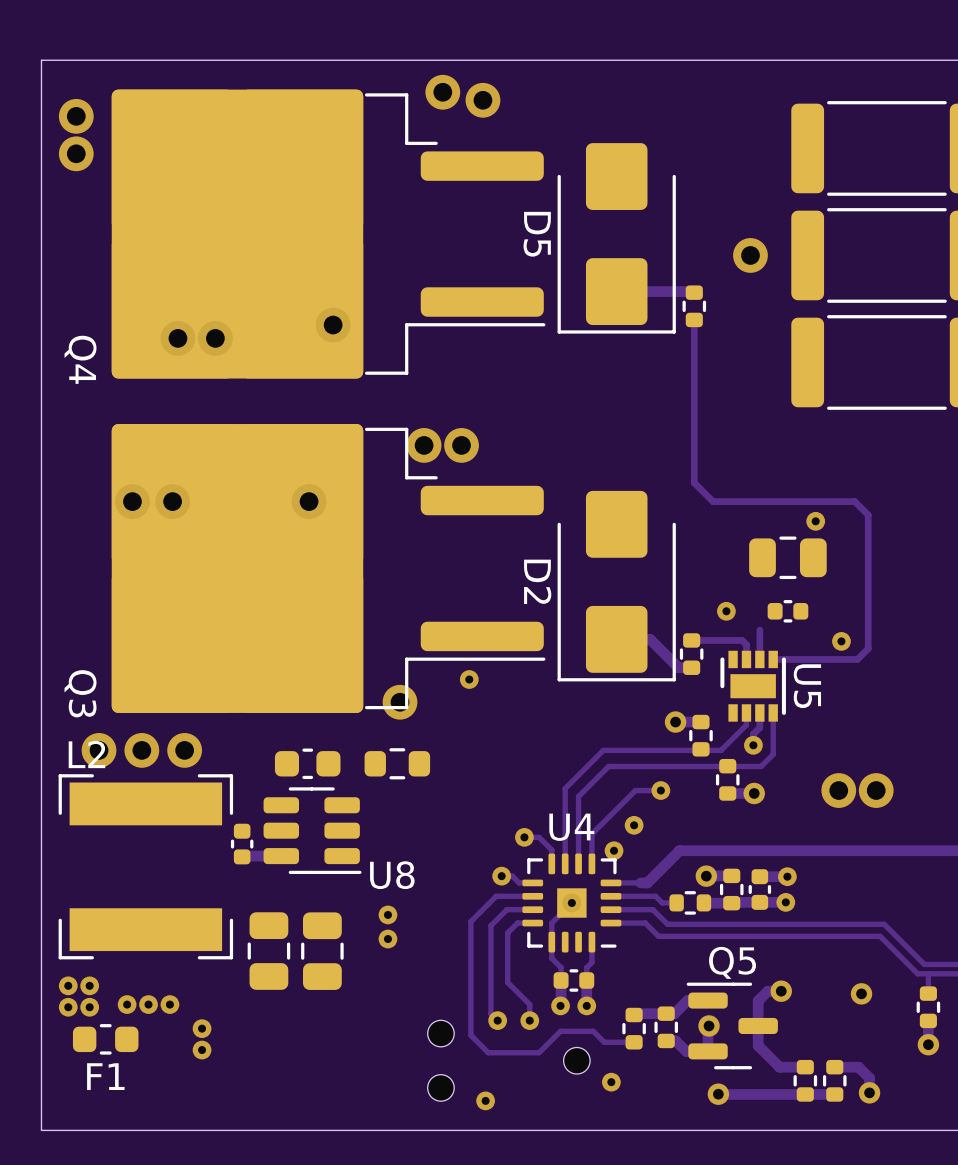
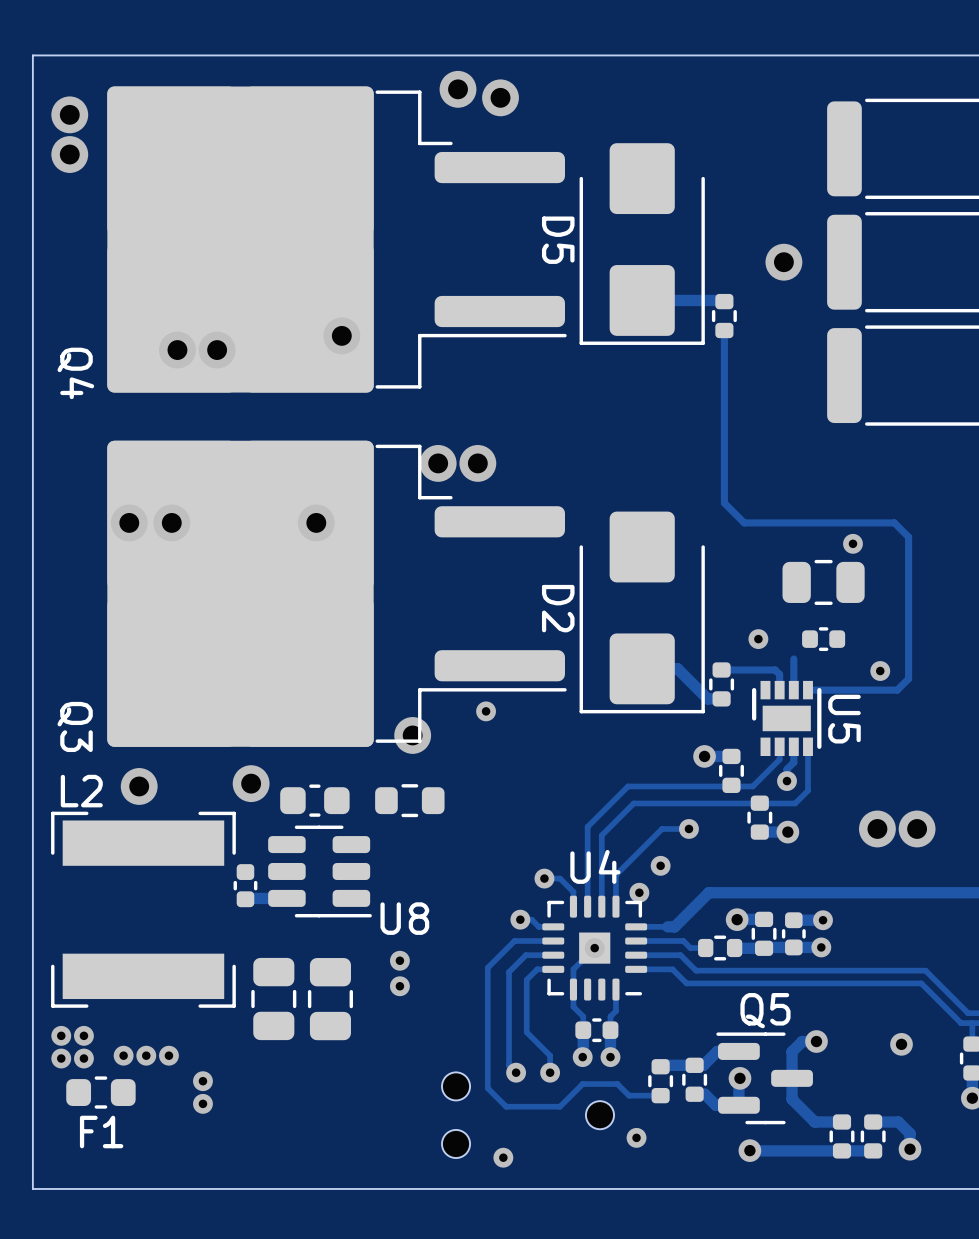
via: (99, 750) -> none
via position: (184, 750) -> (251, 783)

